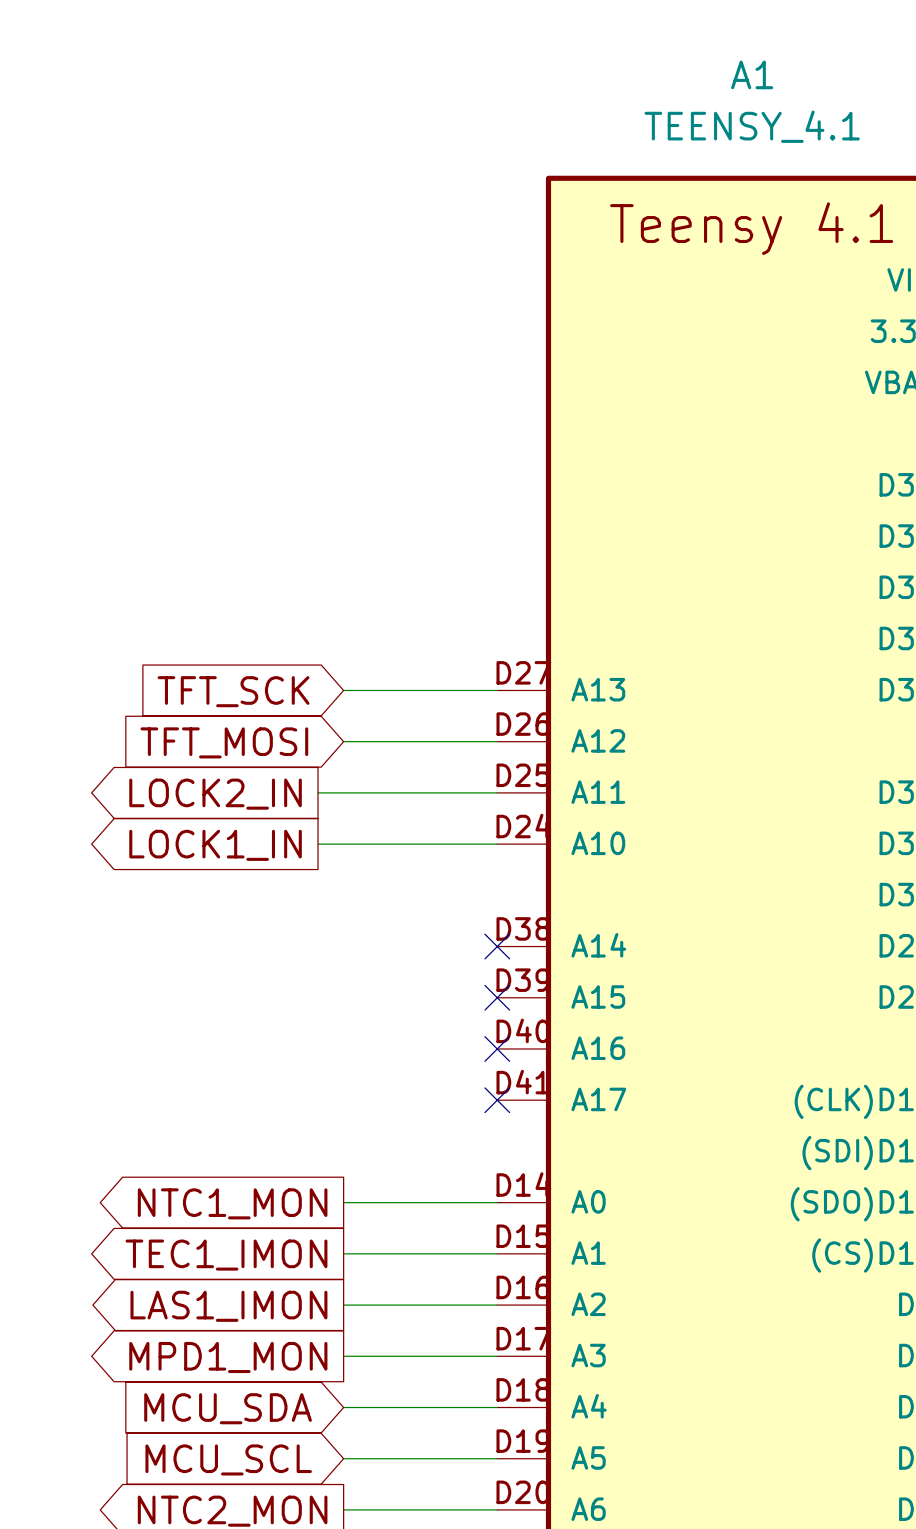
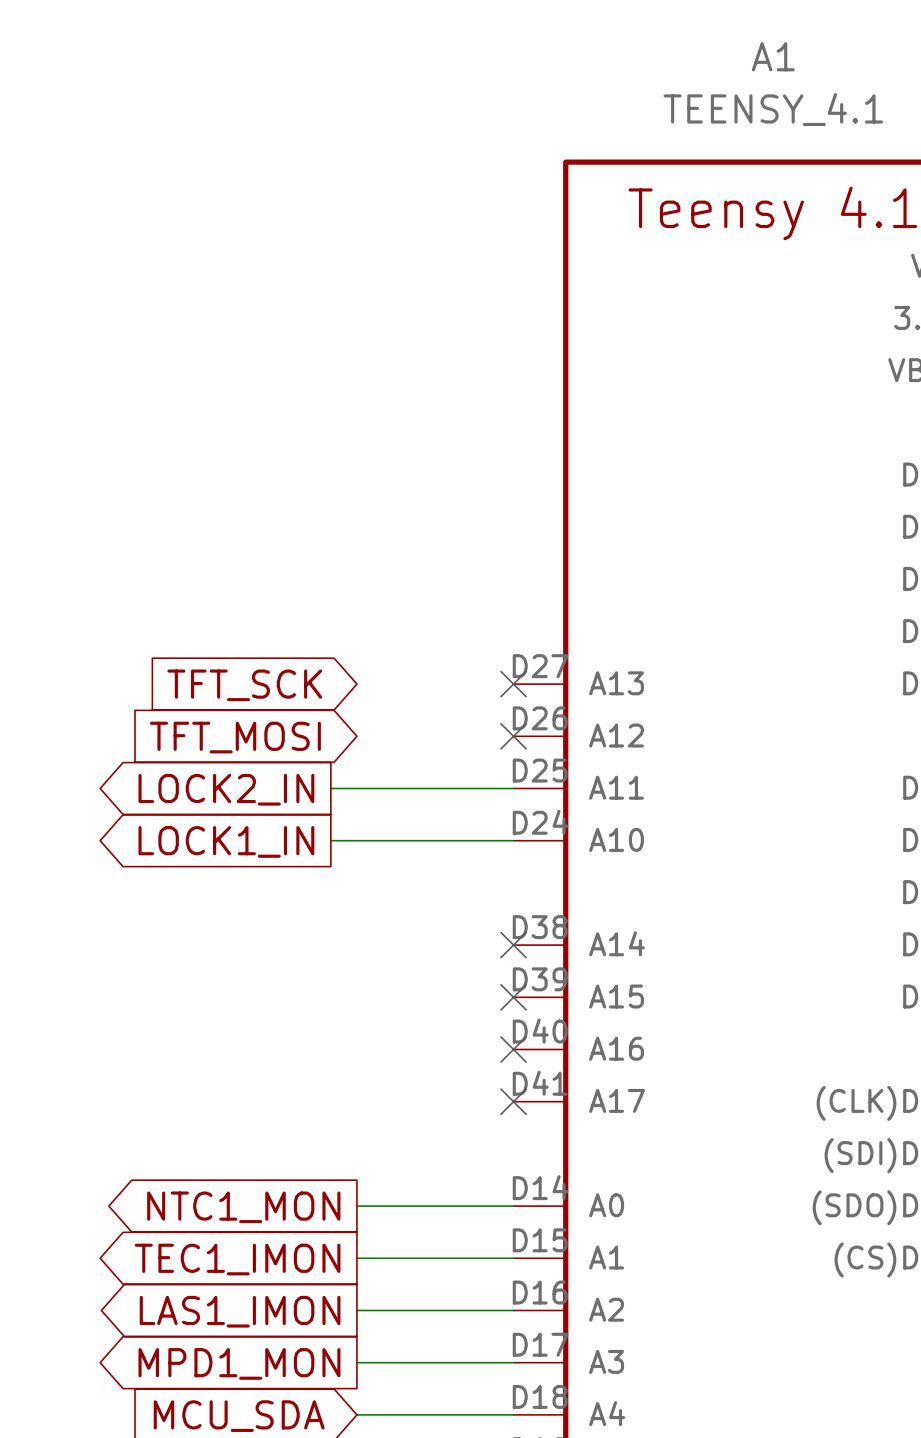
wire: (343, 690) (497, 690) -> none
no-connect mark: none -> (513, 684)
wire: (343, 741) (497, 741) -> none
no-connect mark: none -> (513, 736)

